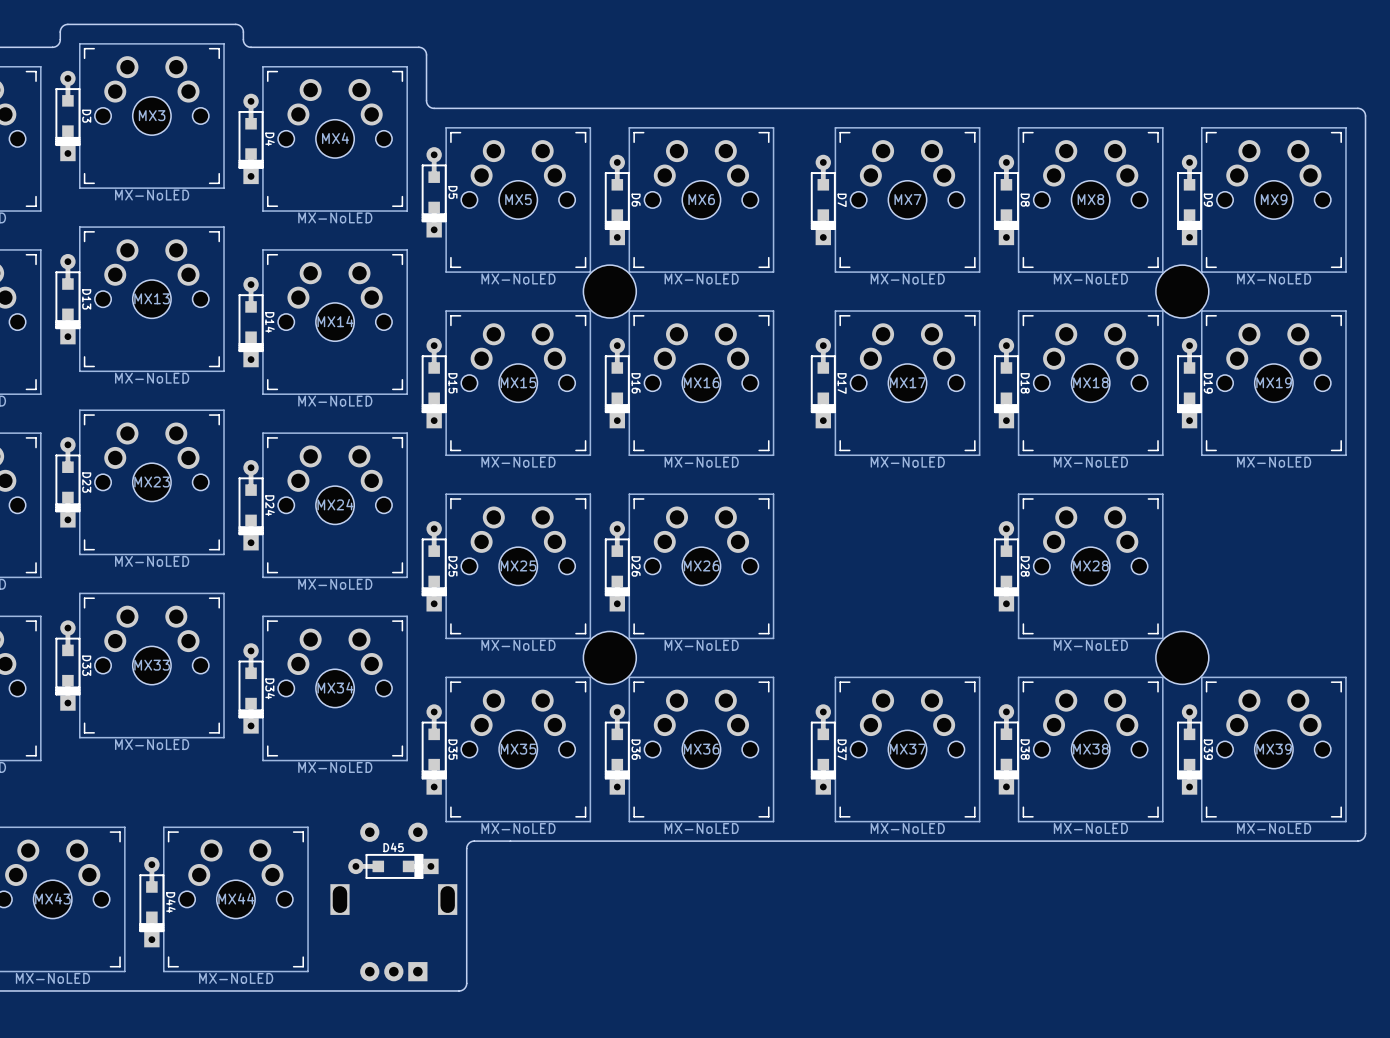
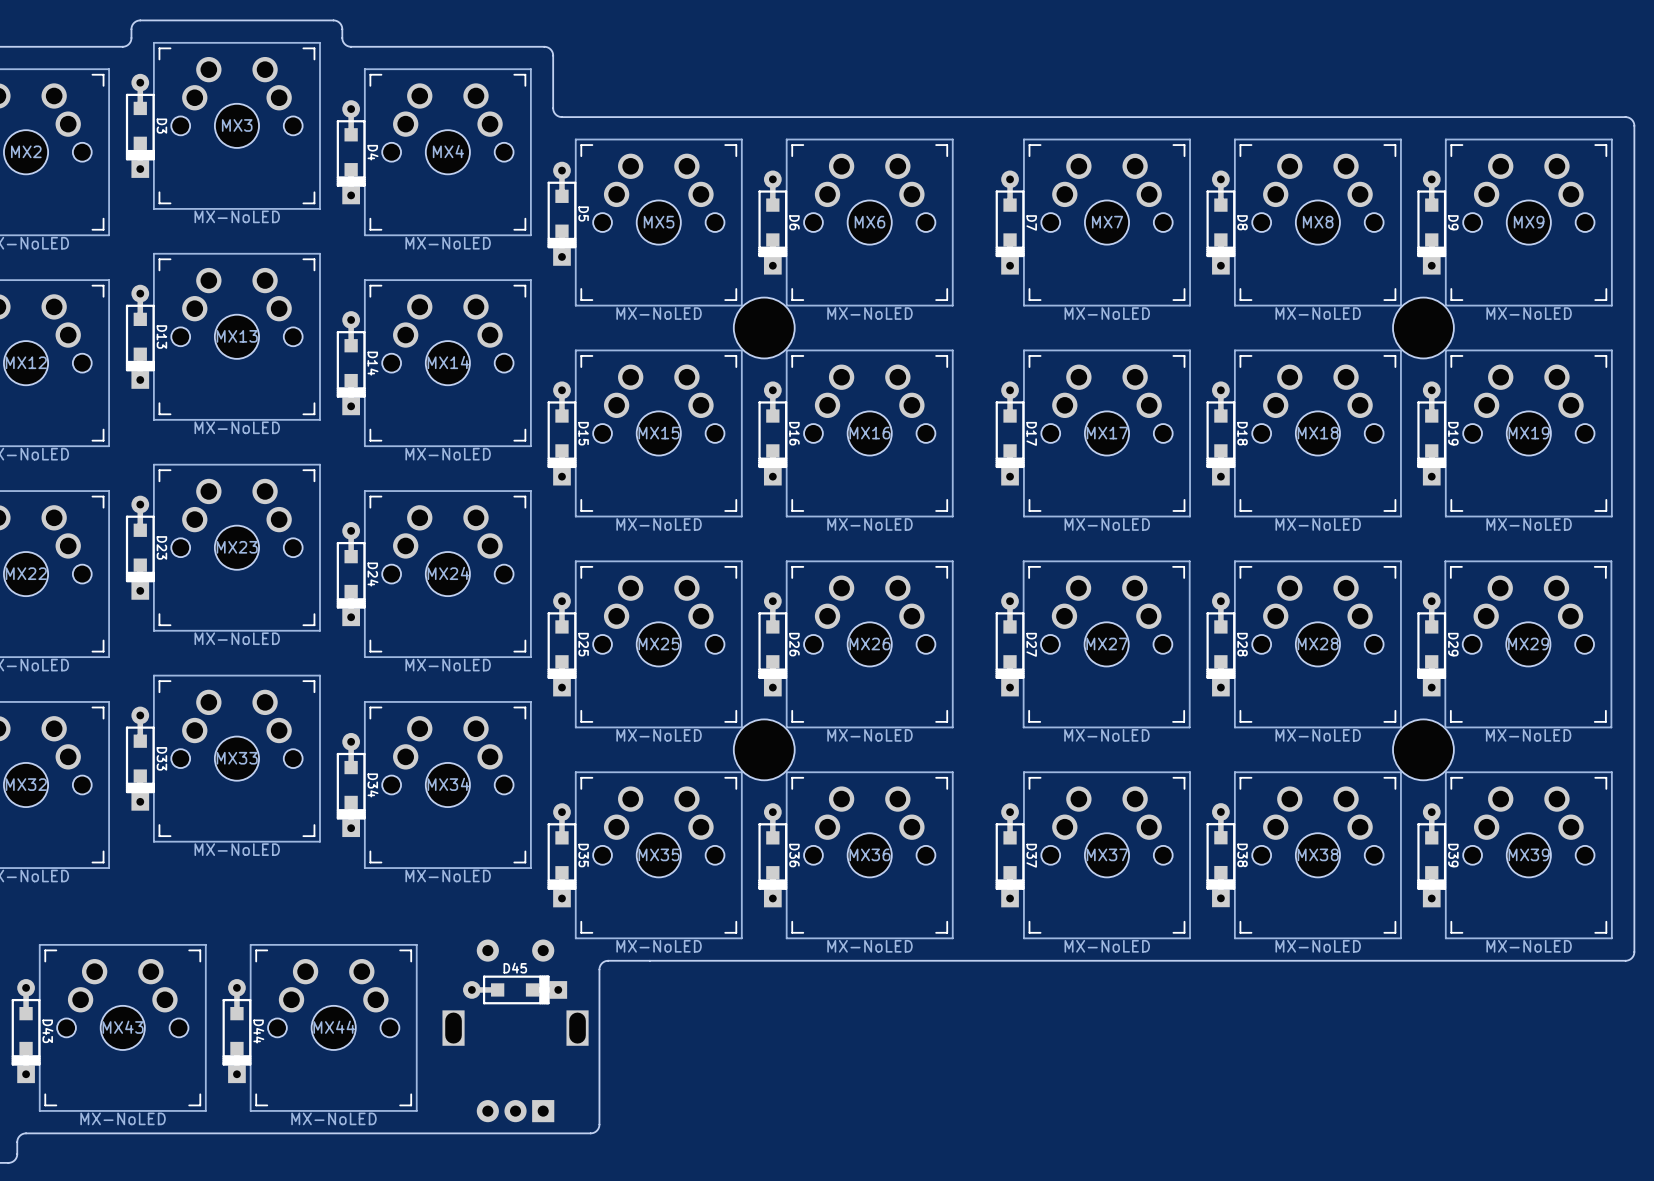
D27: none -> (1010, 644)
MX27: none -> MX-NoLED (1106, 644)
D29: none -> (1431, 644)
MX29: none -> MX-NoLED (1528, 644)

